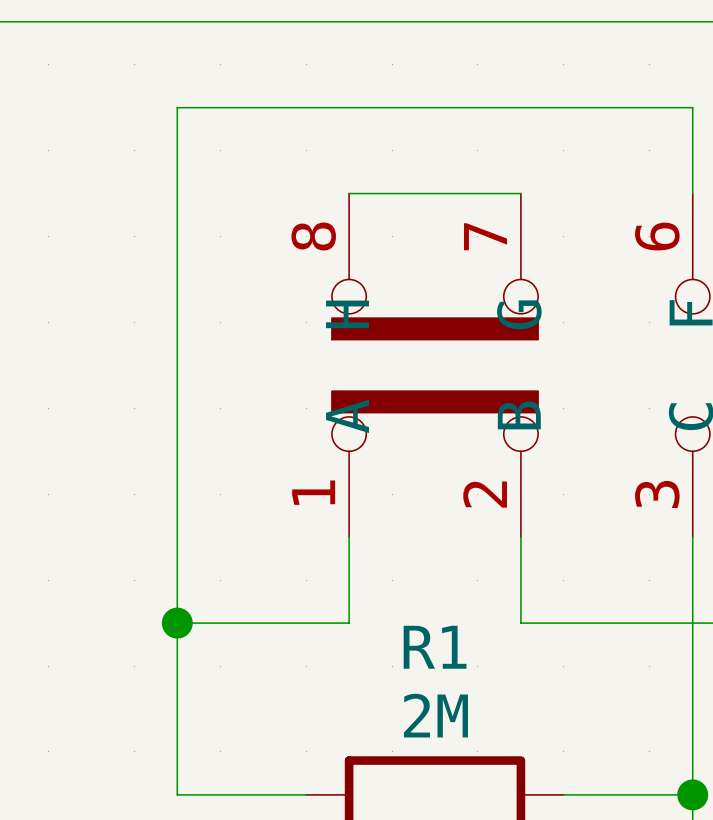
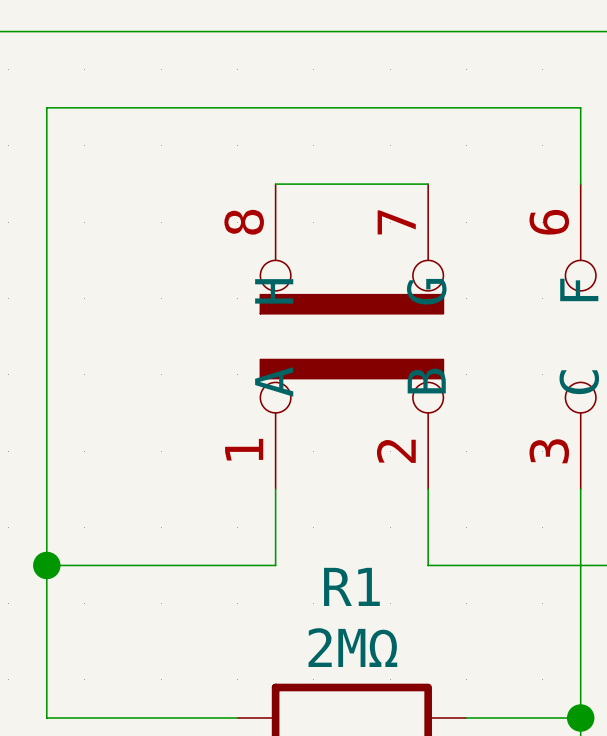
wire: (177, 107) (177, 794) -> (123, 107) (46, 107) (46, 718) (123, 718)
wire: none -> (46, 565) (123, 565)
junction position: (177, 623) -> (46, 565)
R1 value: 2M (435, 715) -> 2MΩ (352, 647)

